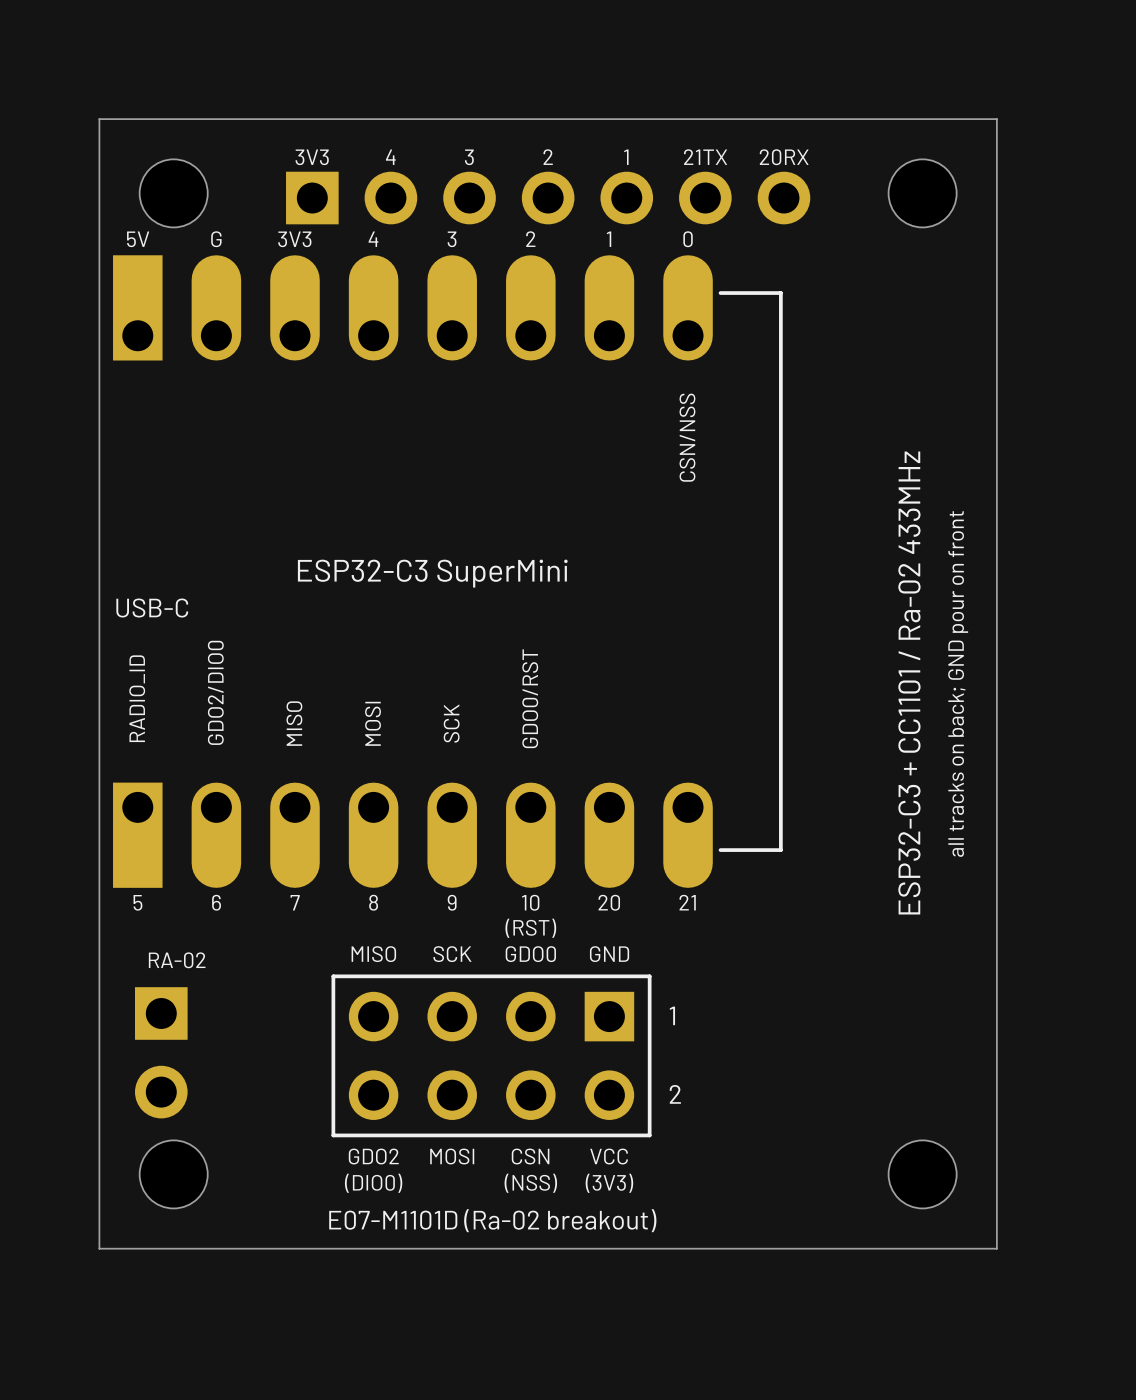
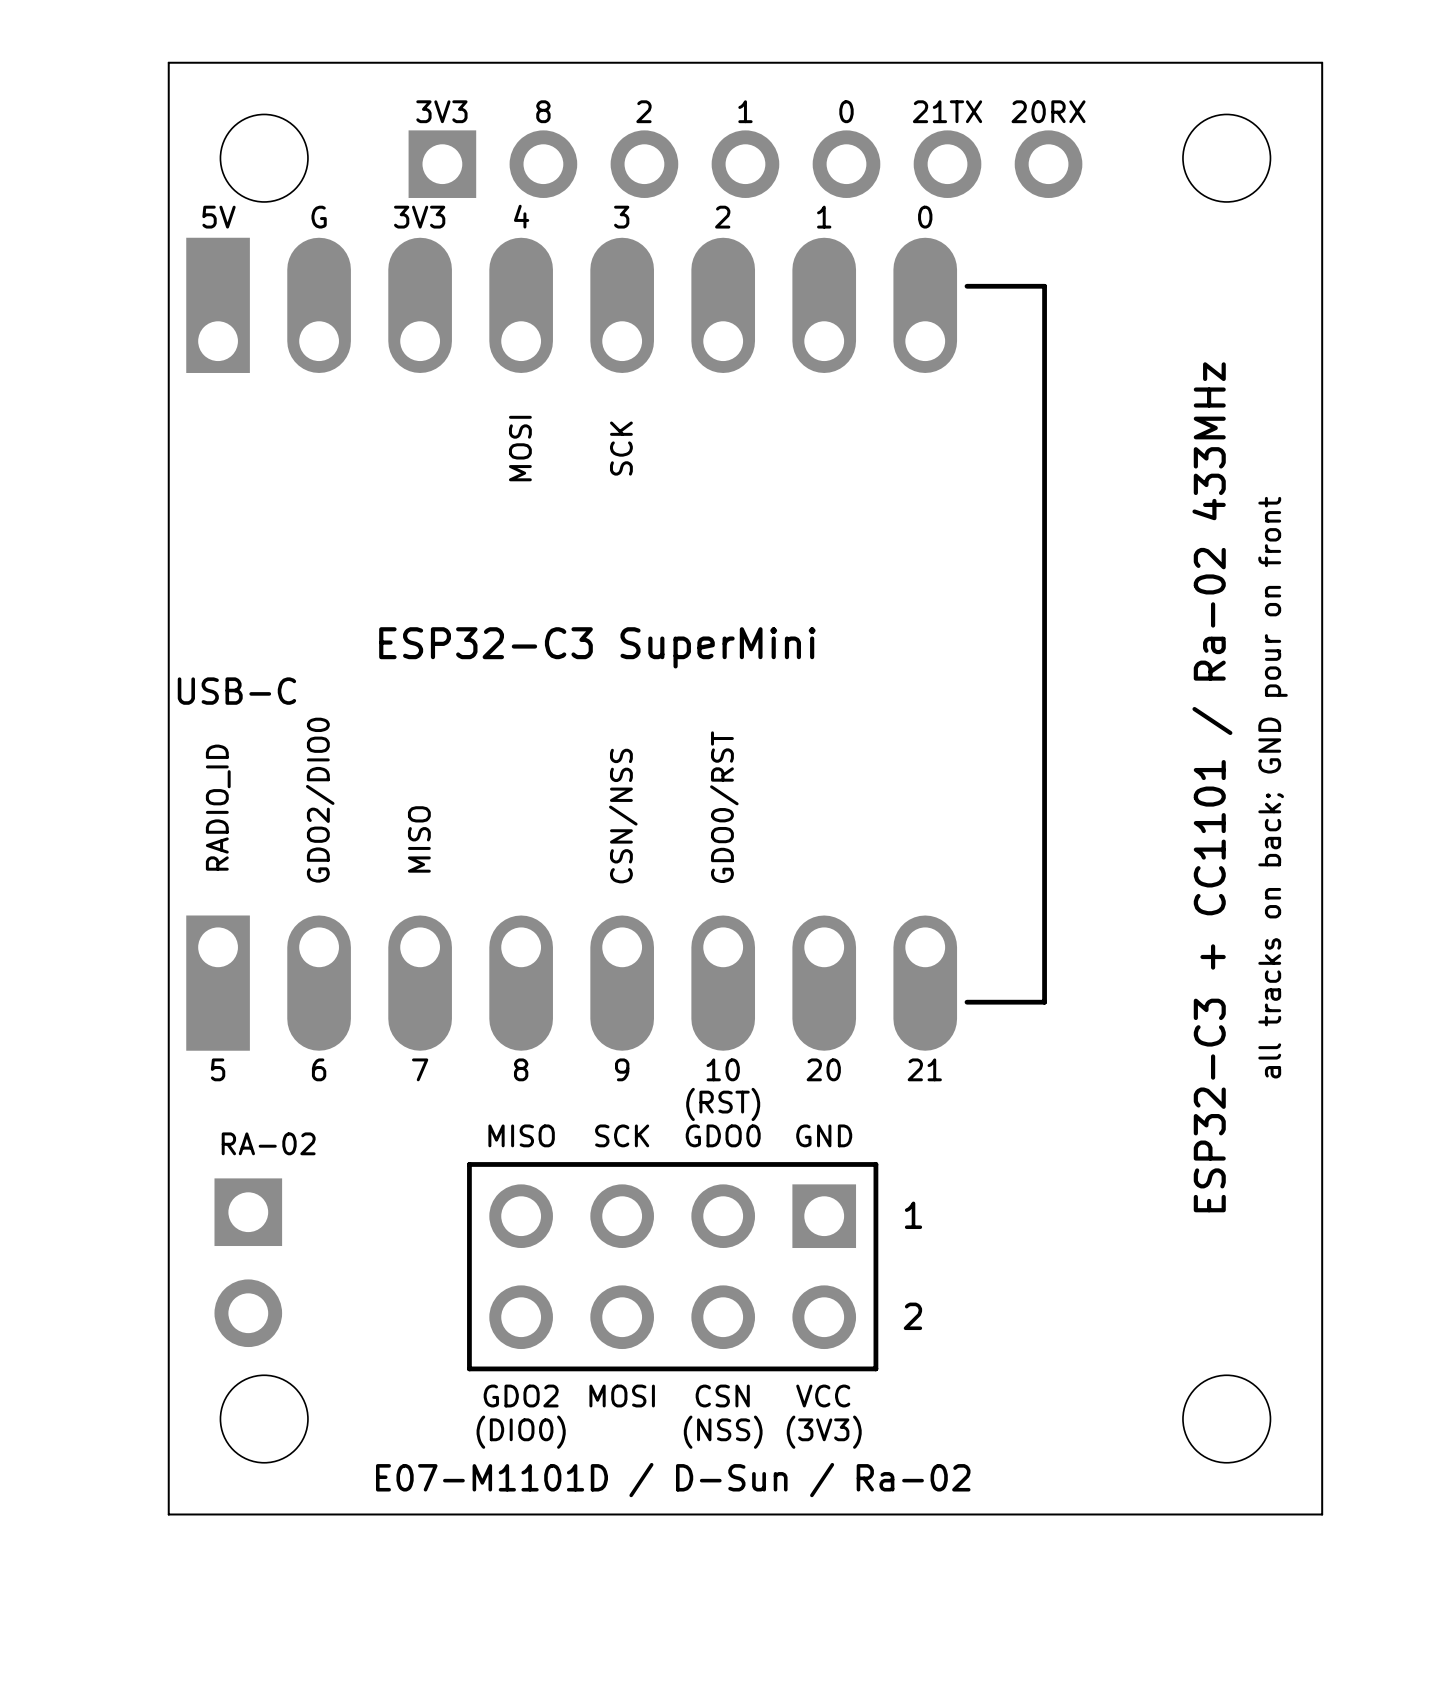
text: 4 (390, 157) -> 8 (543, 111)
text: 3 (469, 157) -> 2 (643, 111)
text: 2 (548, 157) -> 1 (745, 111)
text: 1 (626, 157) -> 0 (846, 111)
text: none -> SCK (621, 448)
text: CSN/NSS (687, 437) -> none
text position: MOSI (373, 723) -> MOSI (520, 448)
text: SCK (451, 723) -> CSN/NSS (623, 816)
text: E07-M1101D (Ra-02 breakout) (492, 1220) -> E07-M1101D / D-Sun / Ra-02 (673, 1480)

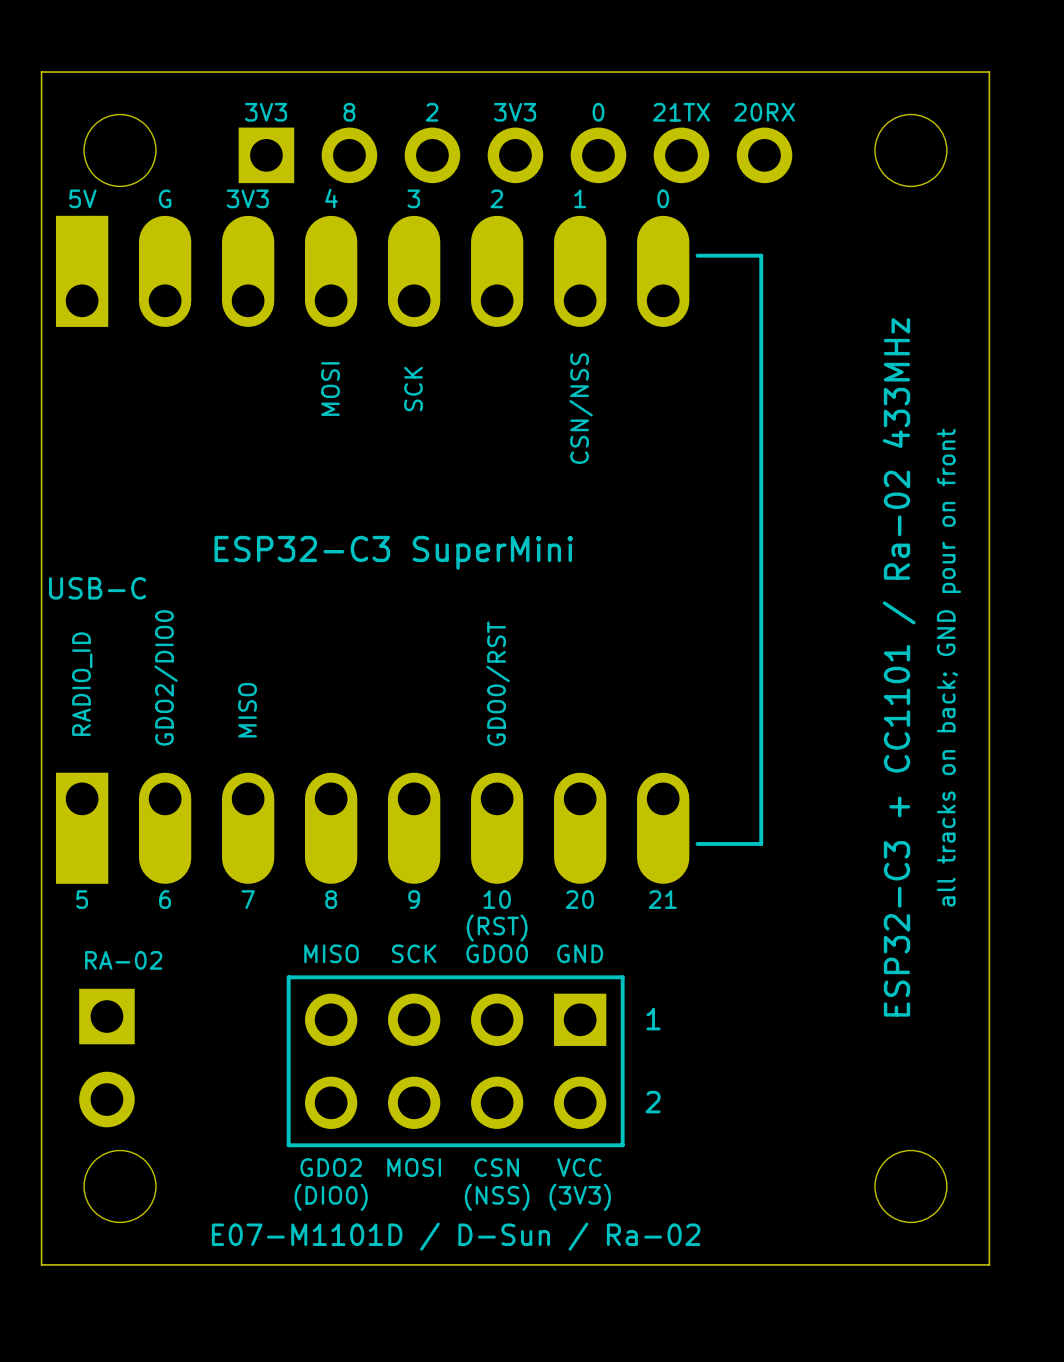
text: 1 (745, 111) -> 3V3 (515, 112)
text position: CSN/NSS (623, 816) -> CSN/NSS (581, 408)

